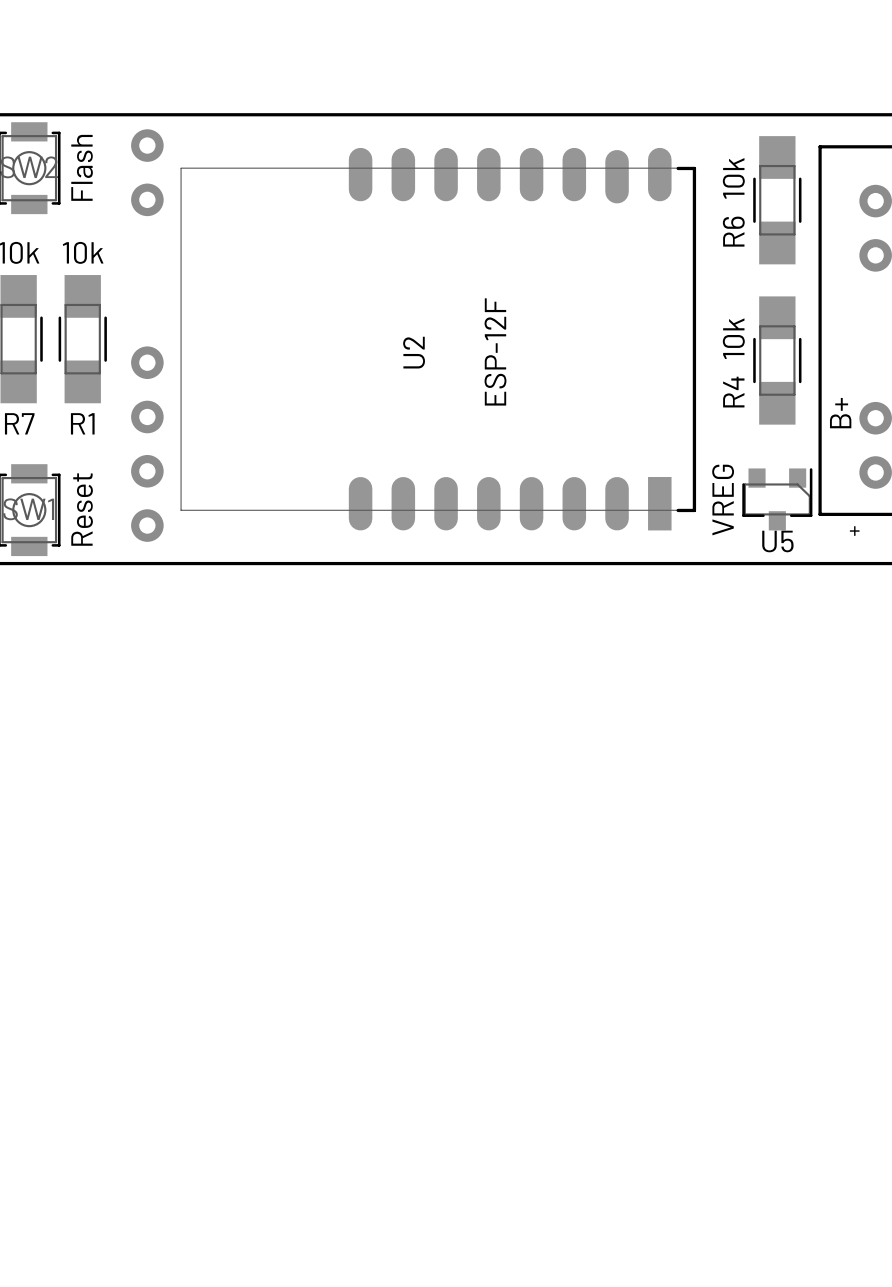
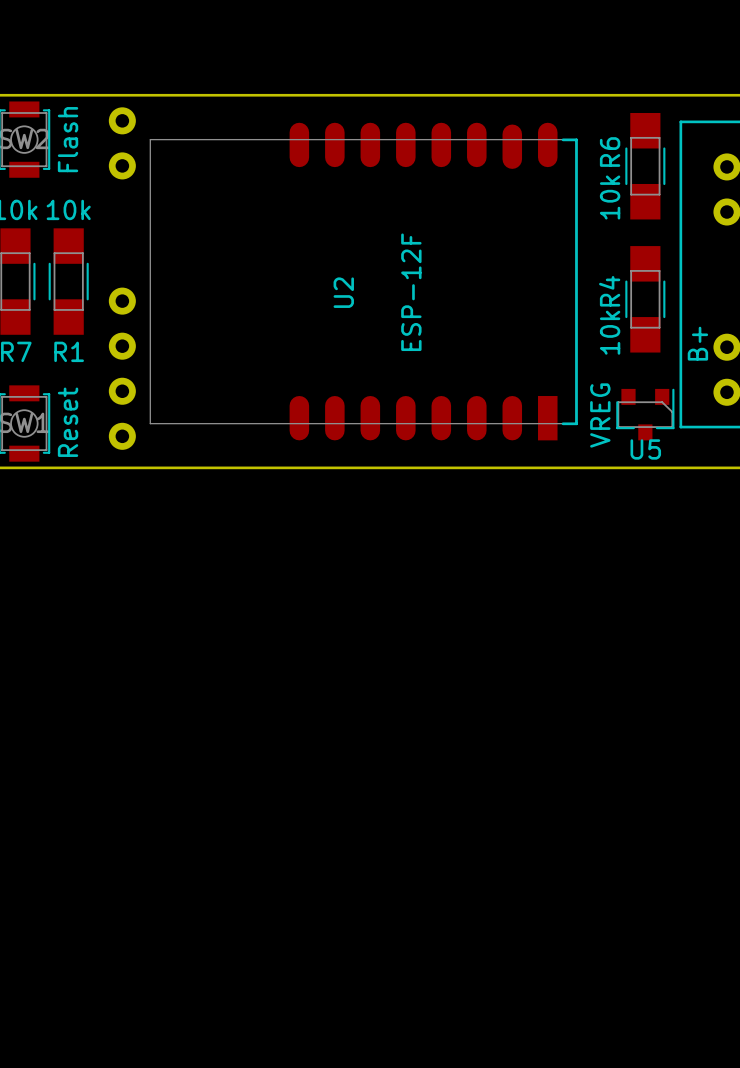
R6 value position: 10k (733, 178) -> 10k (610, 197)
R6 name position: R6 (733, 231) -> R6 (610, 152)
R4 value position: 10k (733, 338) -> 10k (610, 332)
R4 name position: R4 (733, 392) -> R4 (609, 291)
text: + (854, 531) -> none

